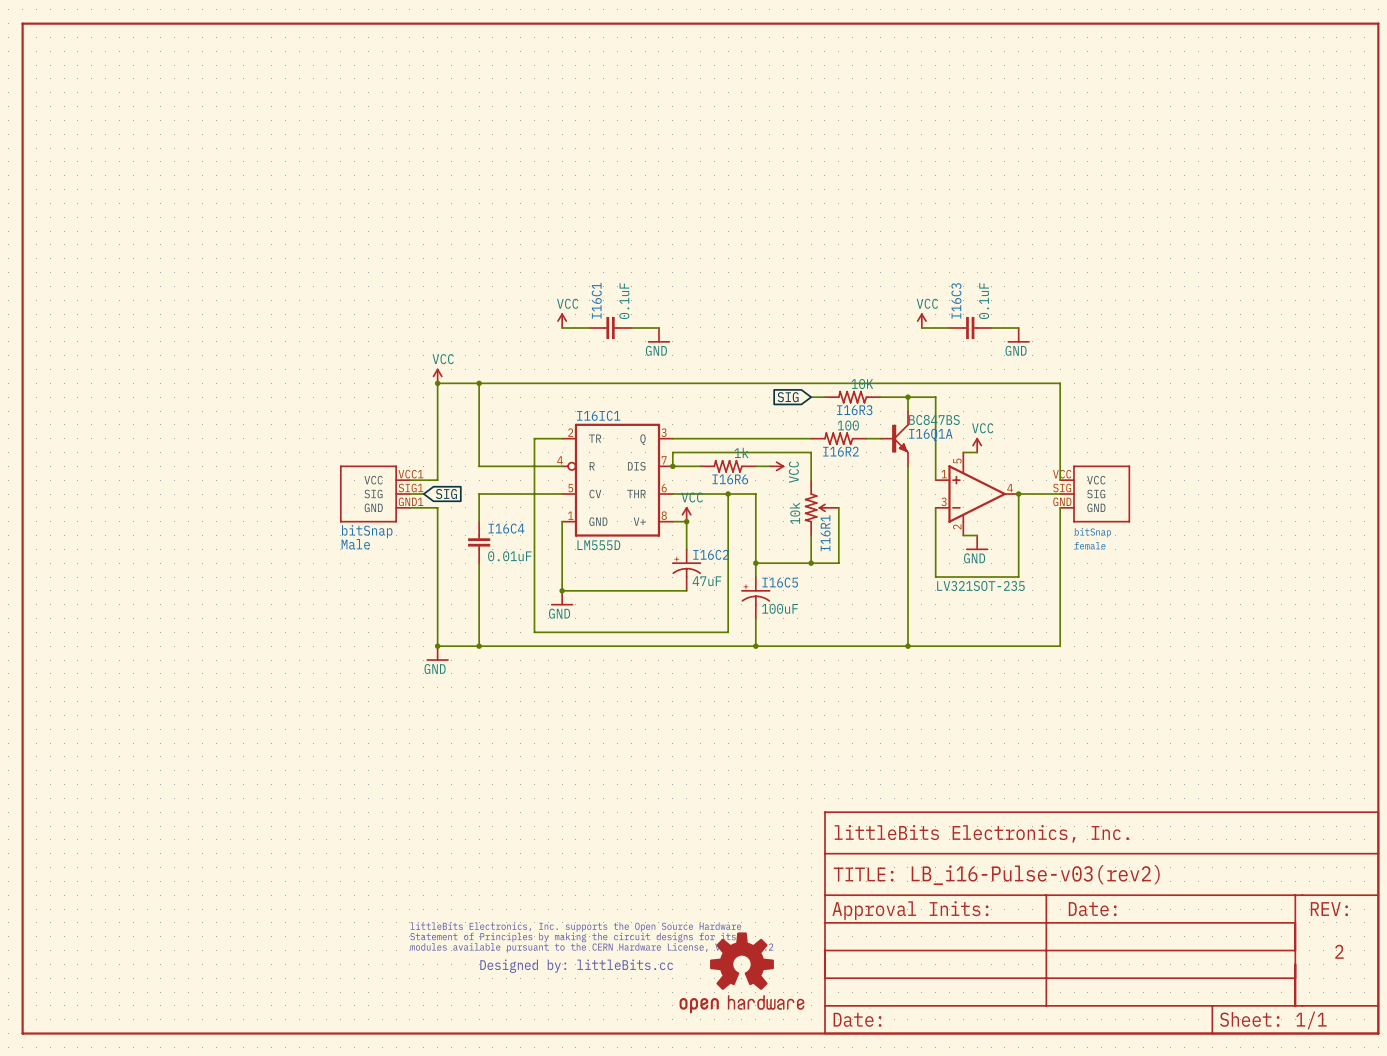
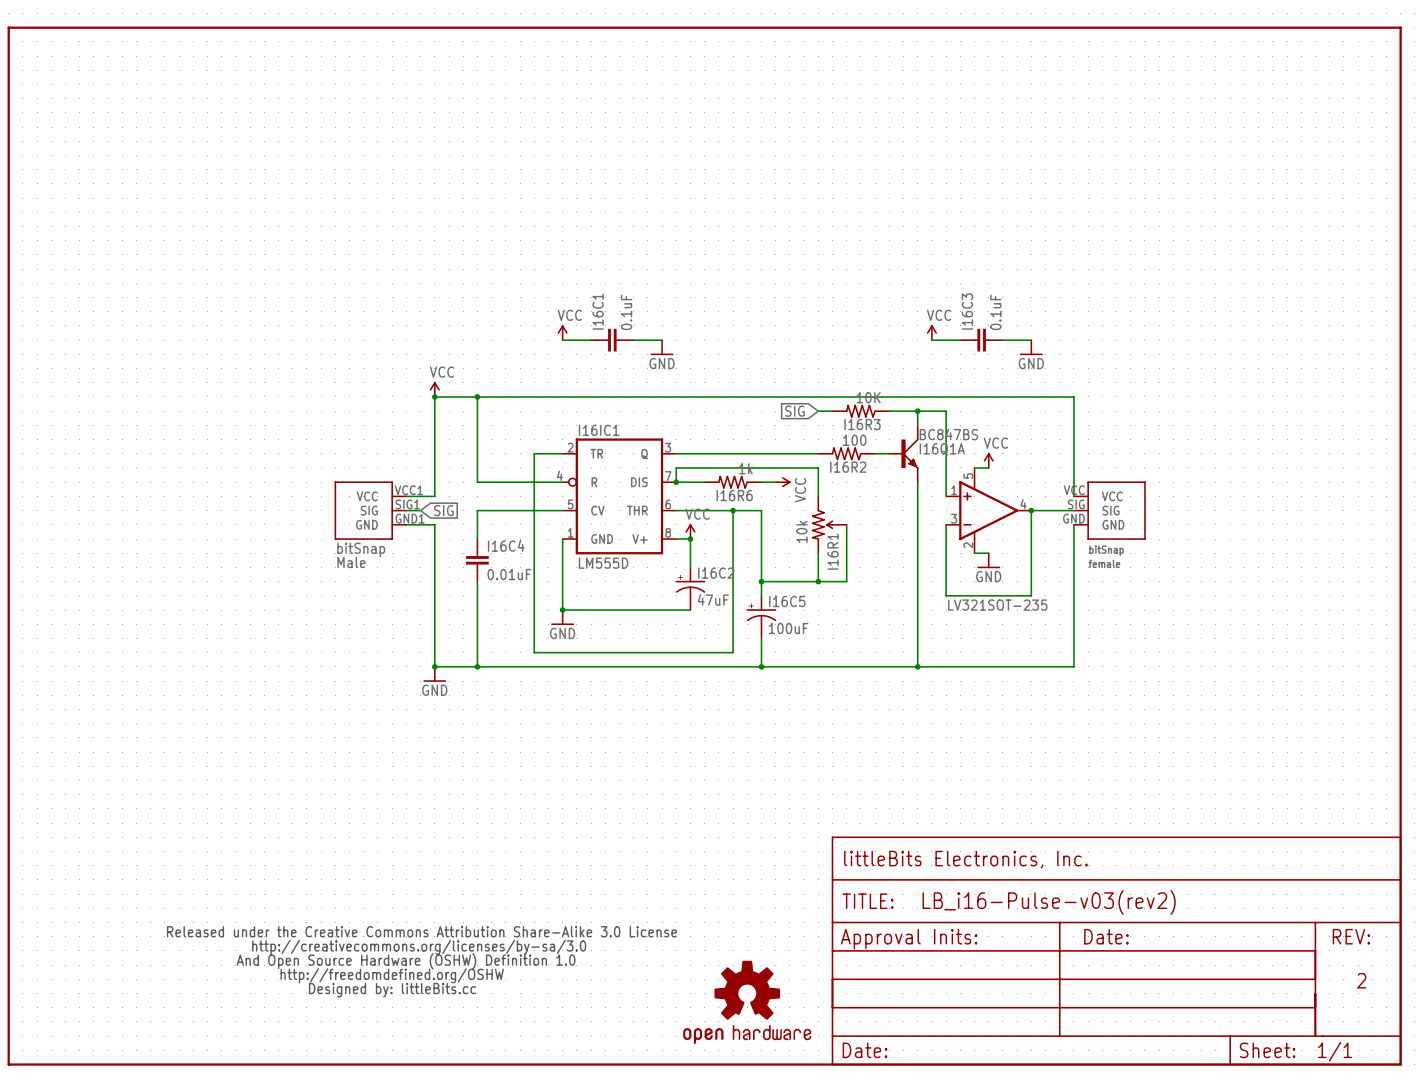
part: none -> (421, 961)
part: (591, 947) -> none

